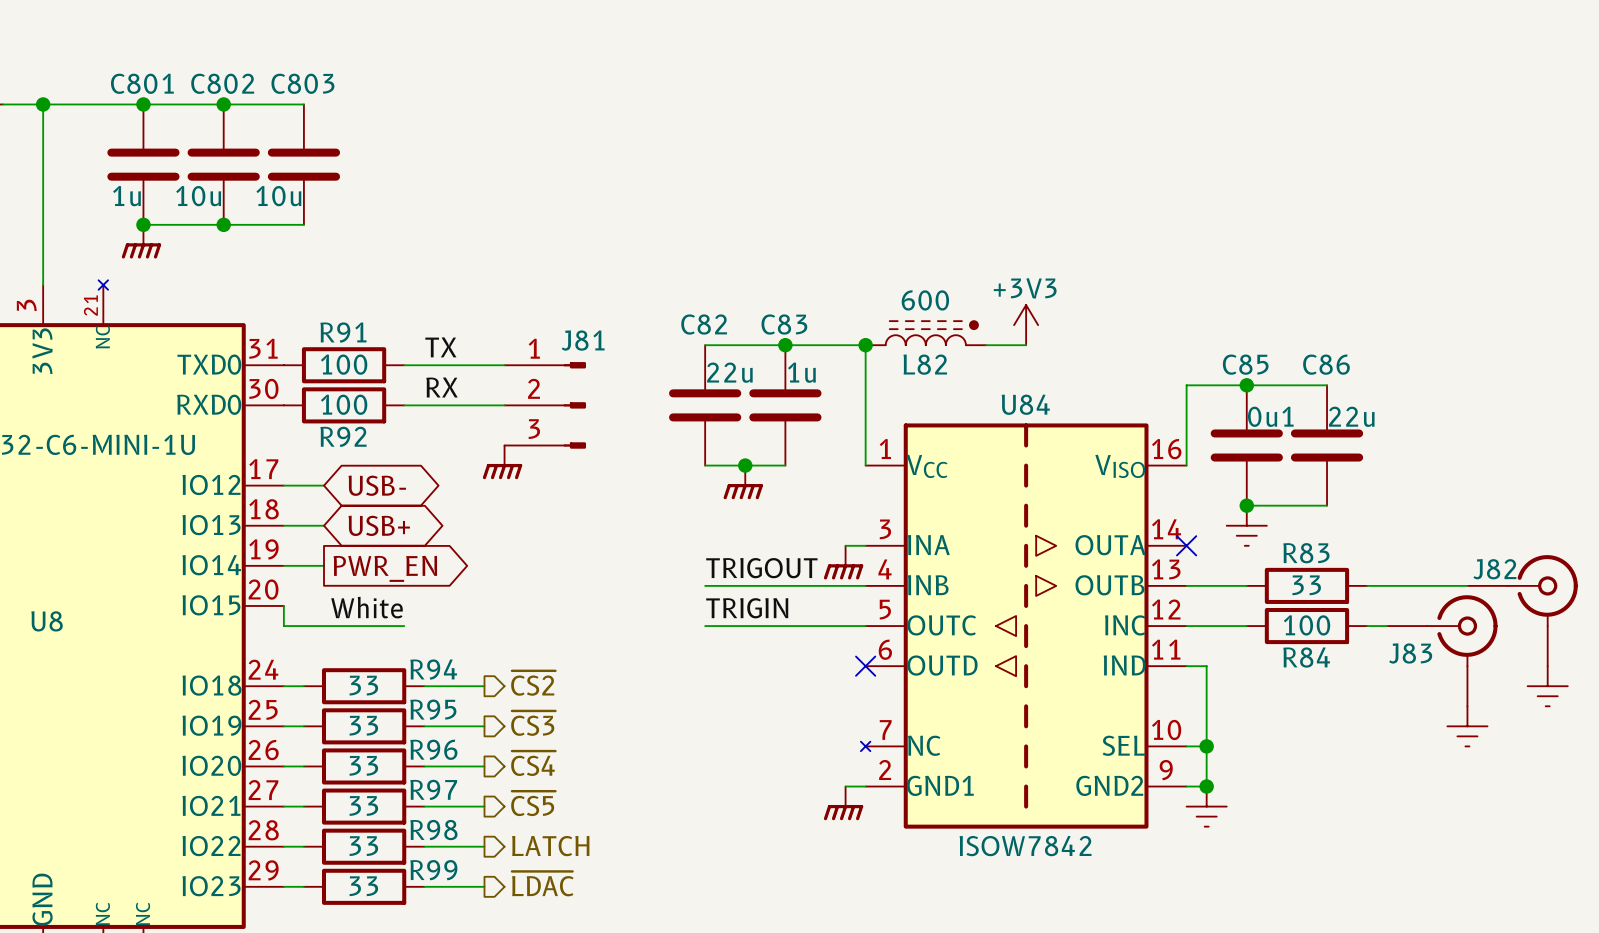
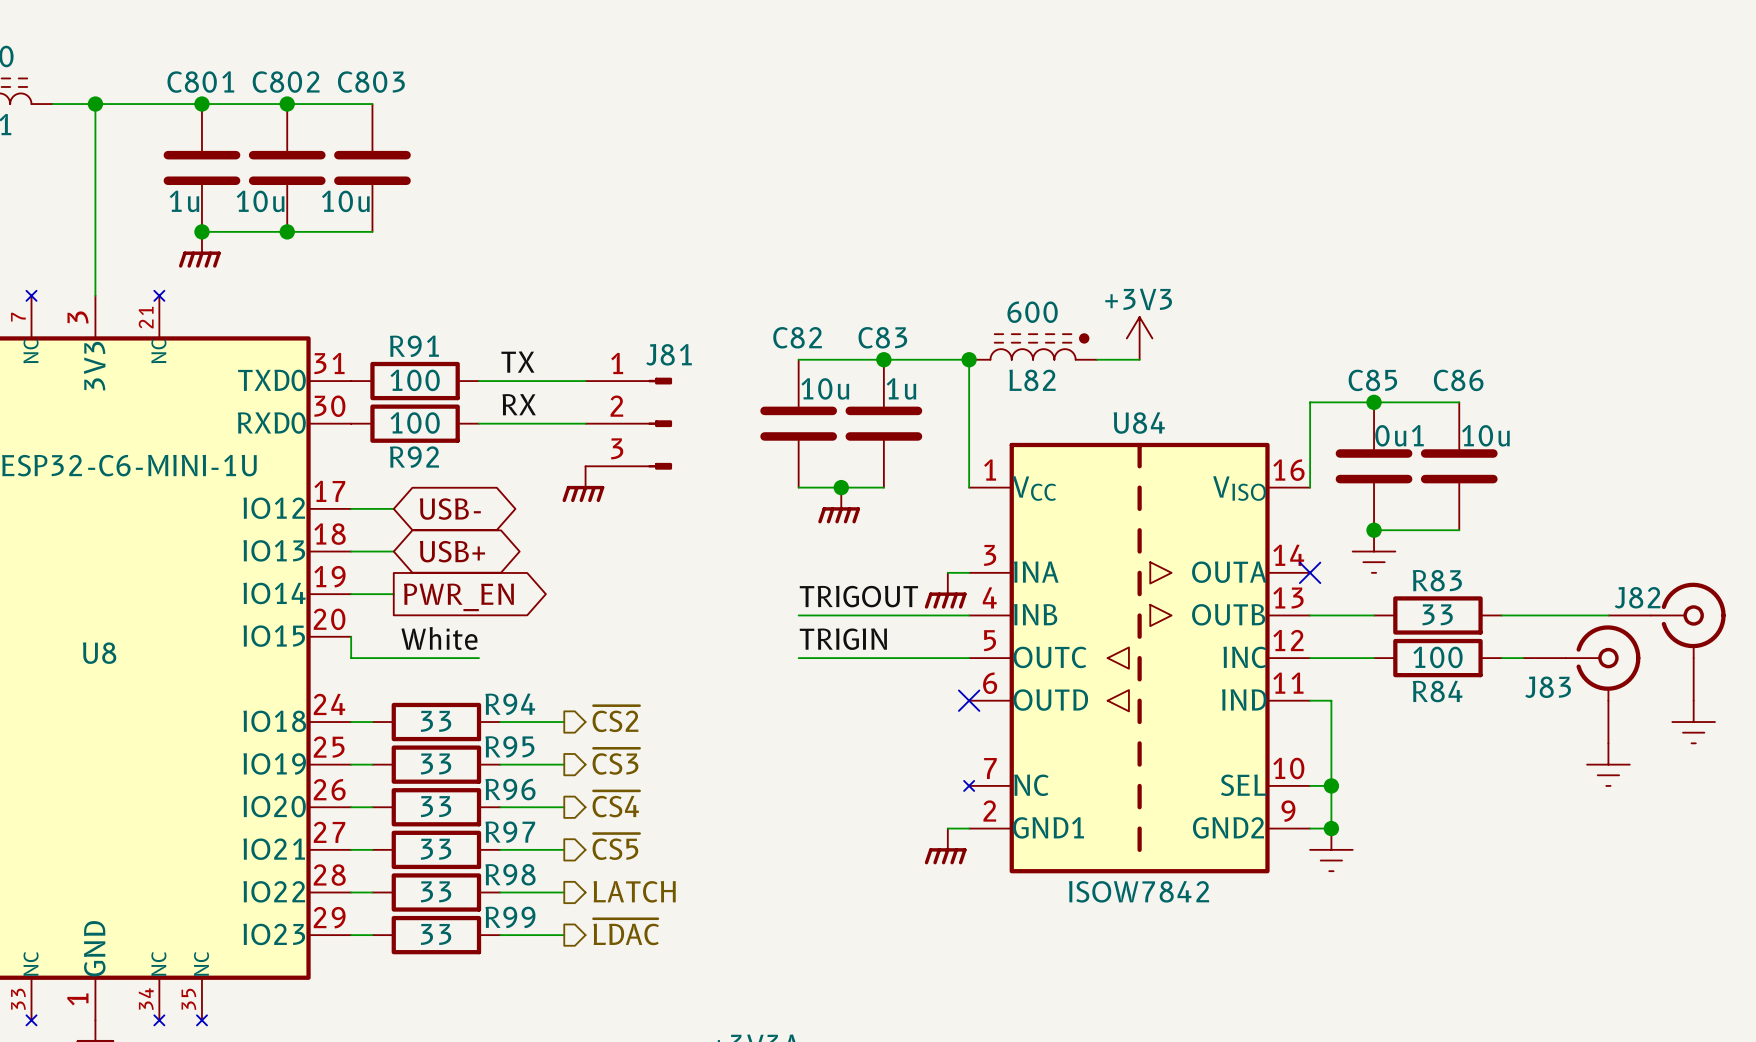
C82 value: 22u (729, 372) -> 10u (825, 388)
C86 value: 22u (1351, 416) -> 10u (1485, 435)

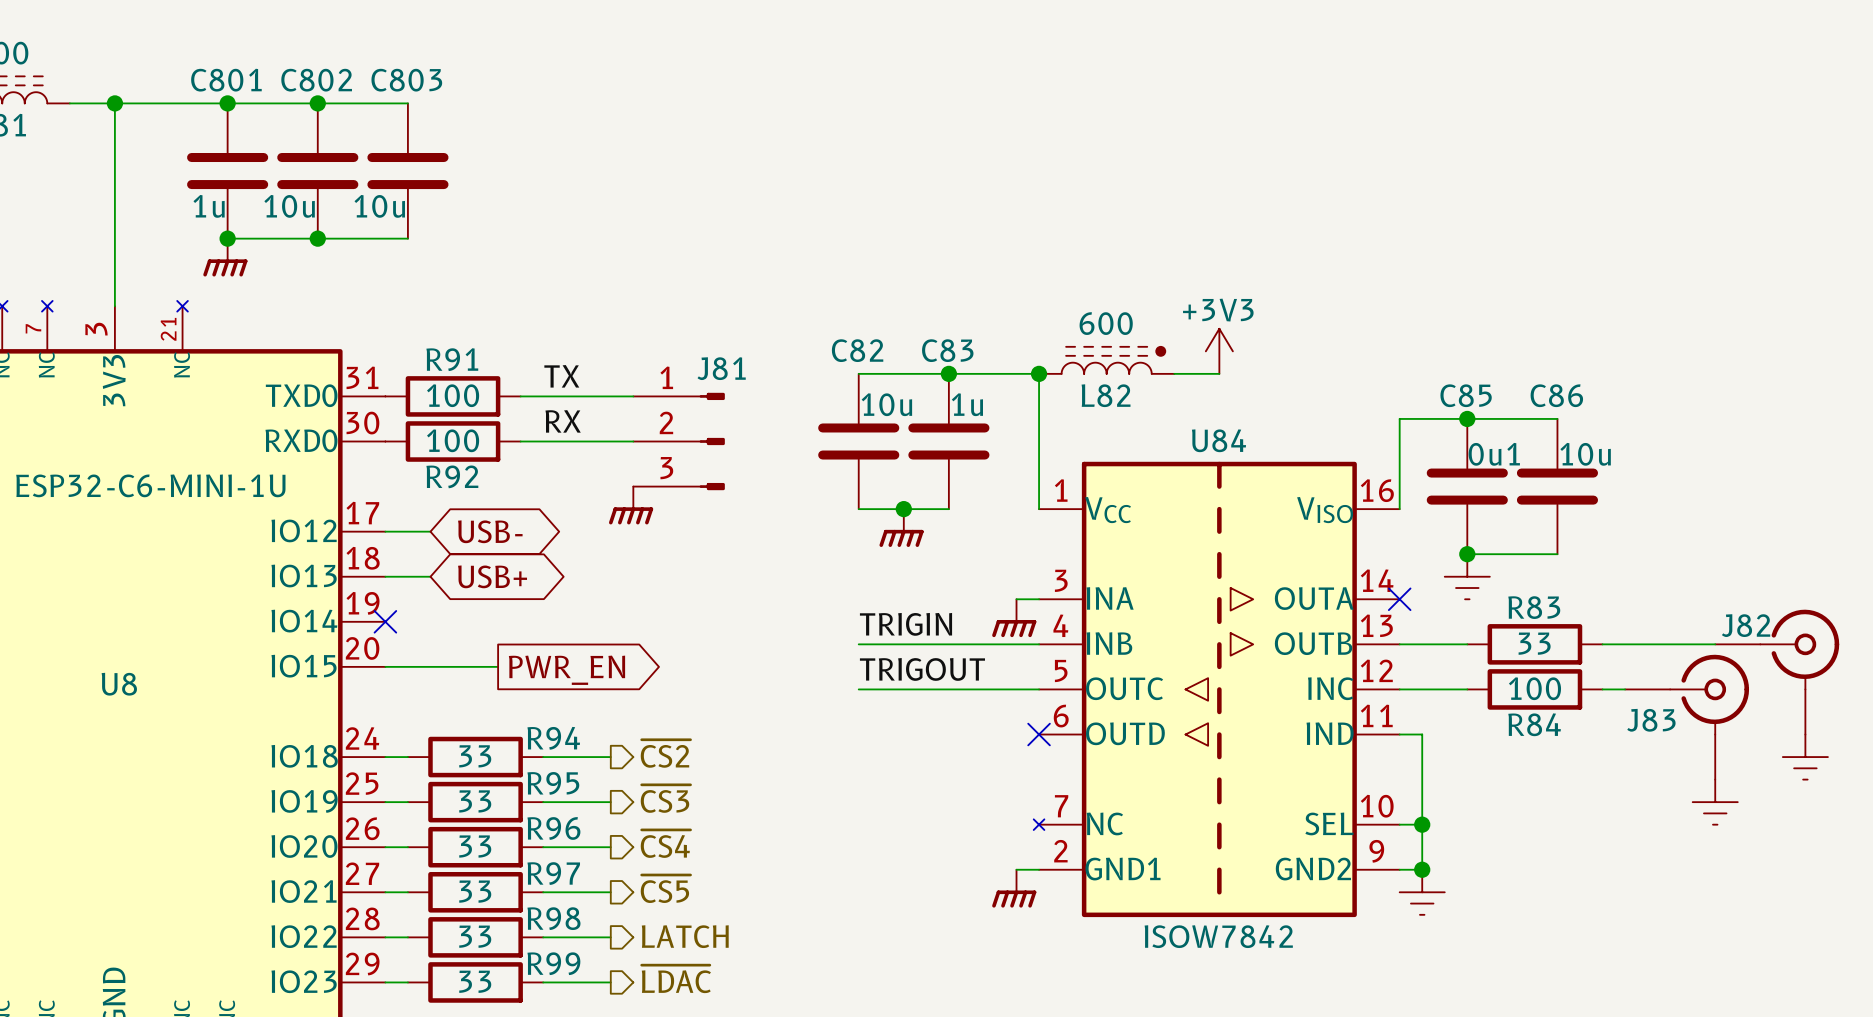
wire: (351, 594) (393, 594) -> none
no-connect mark: none -> (385, 621)
label: TRIGOUT (858, 596) -> TRIGIN (906, 624)
global label position: PWR_EN (458, 597) -> PWR_EN (566, 670)
wire: (351, 636) (351, 658) (479, 658) -> (385, 666) (498, 666)
label: White (439, 638) -> none
label: TRIGIN (843, 639) -> TRIGOUT (922, 669)

